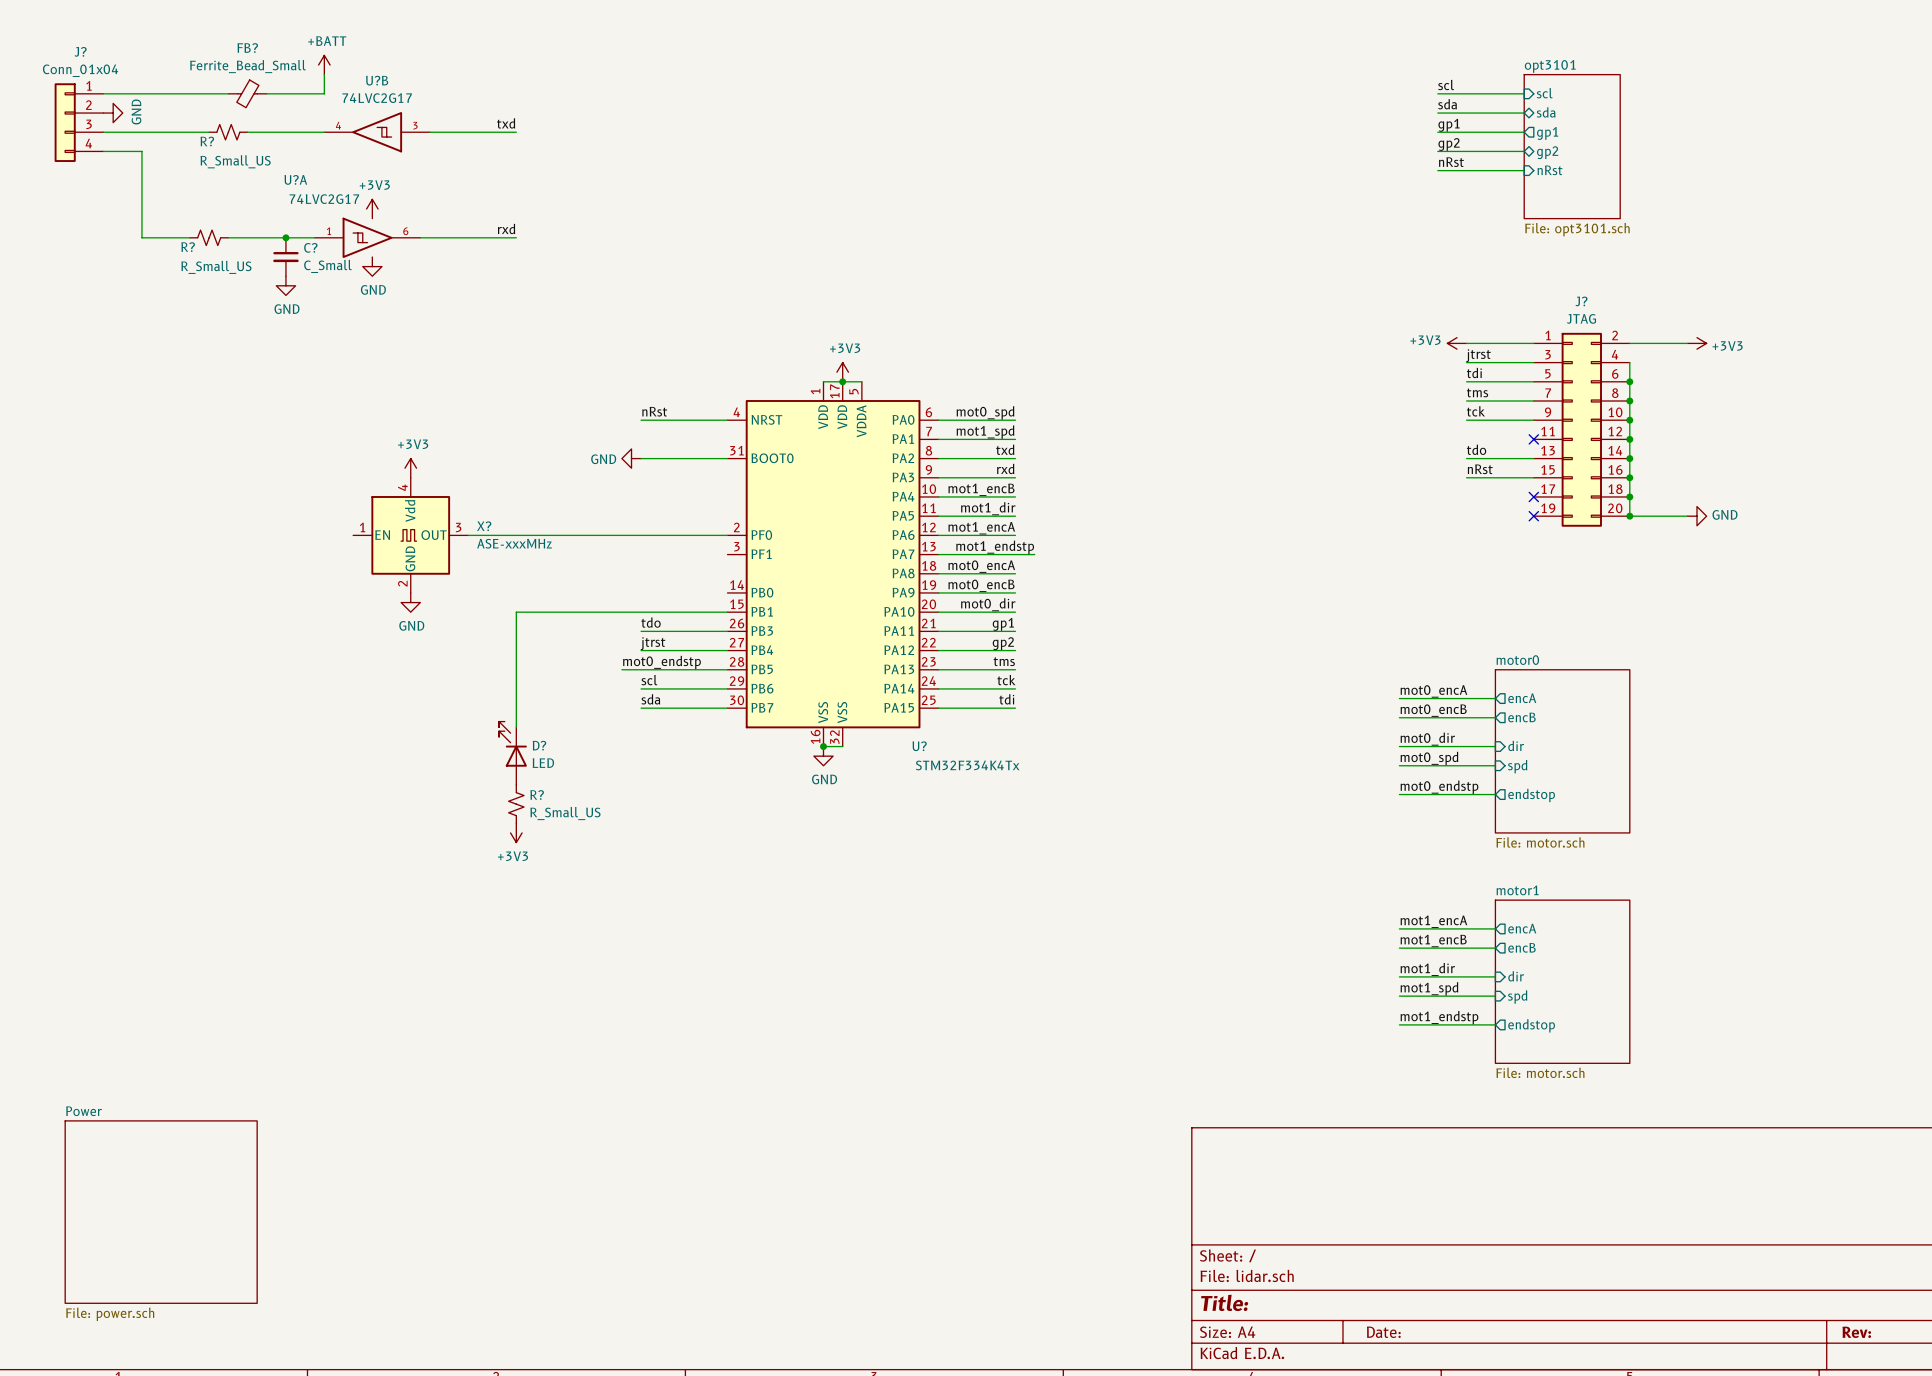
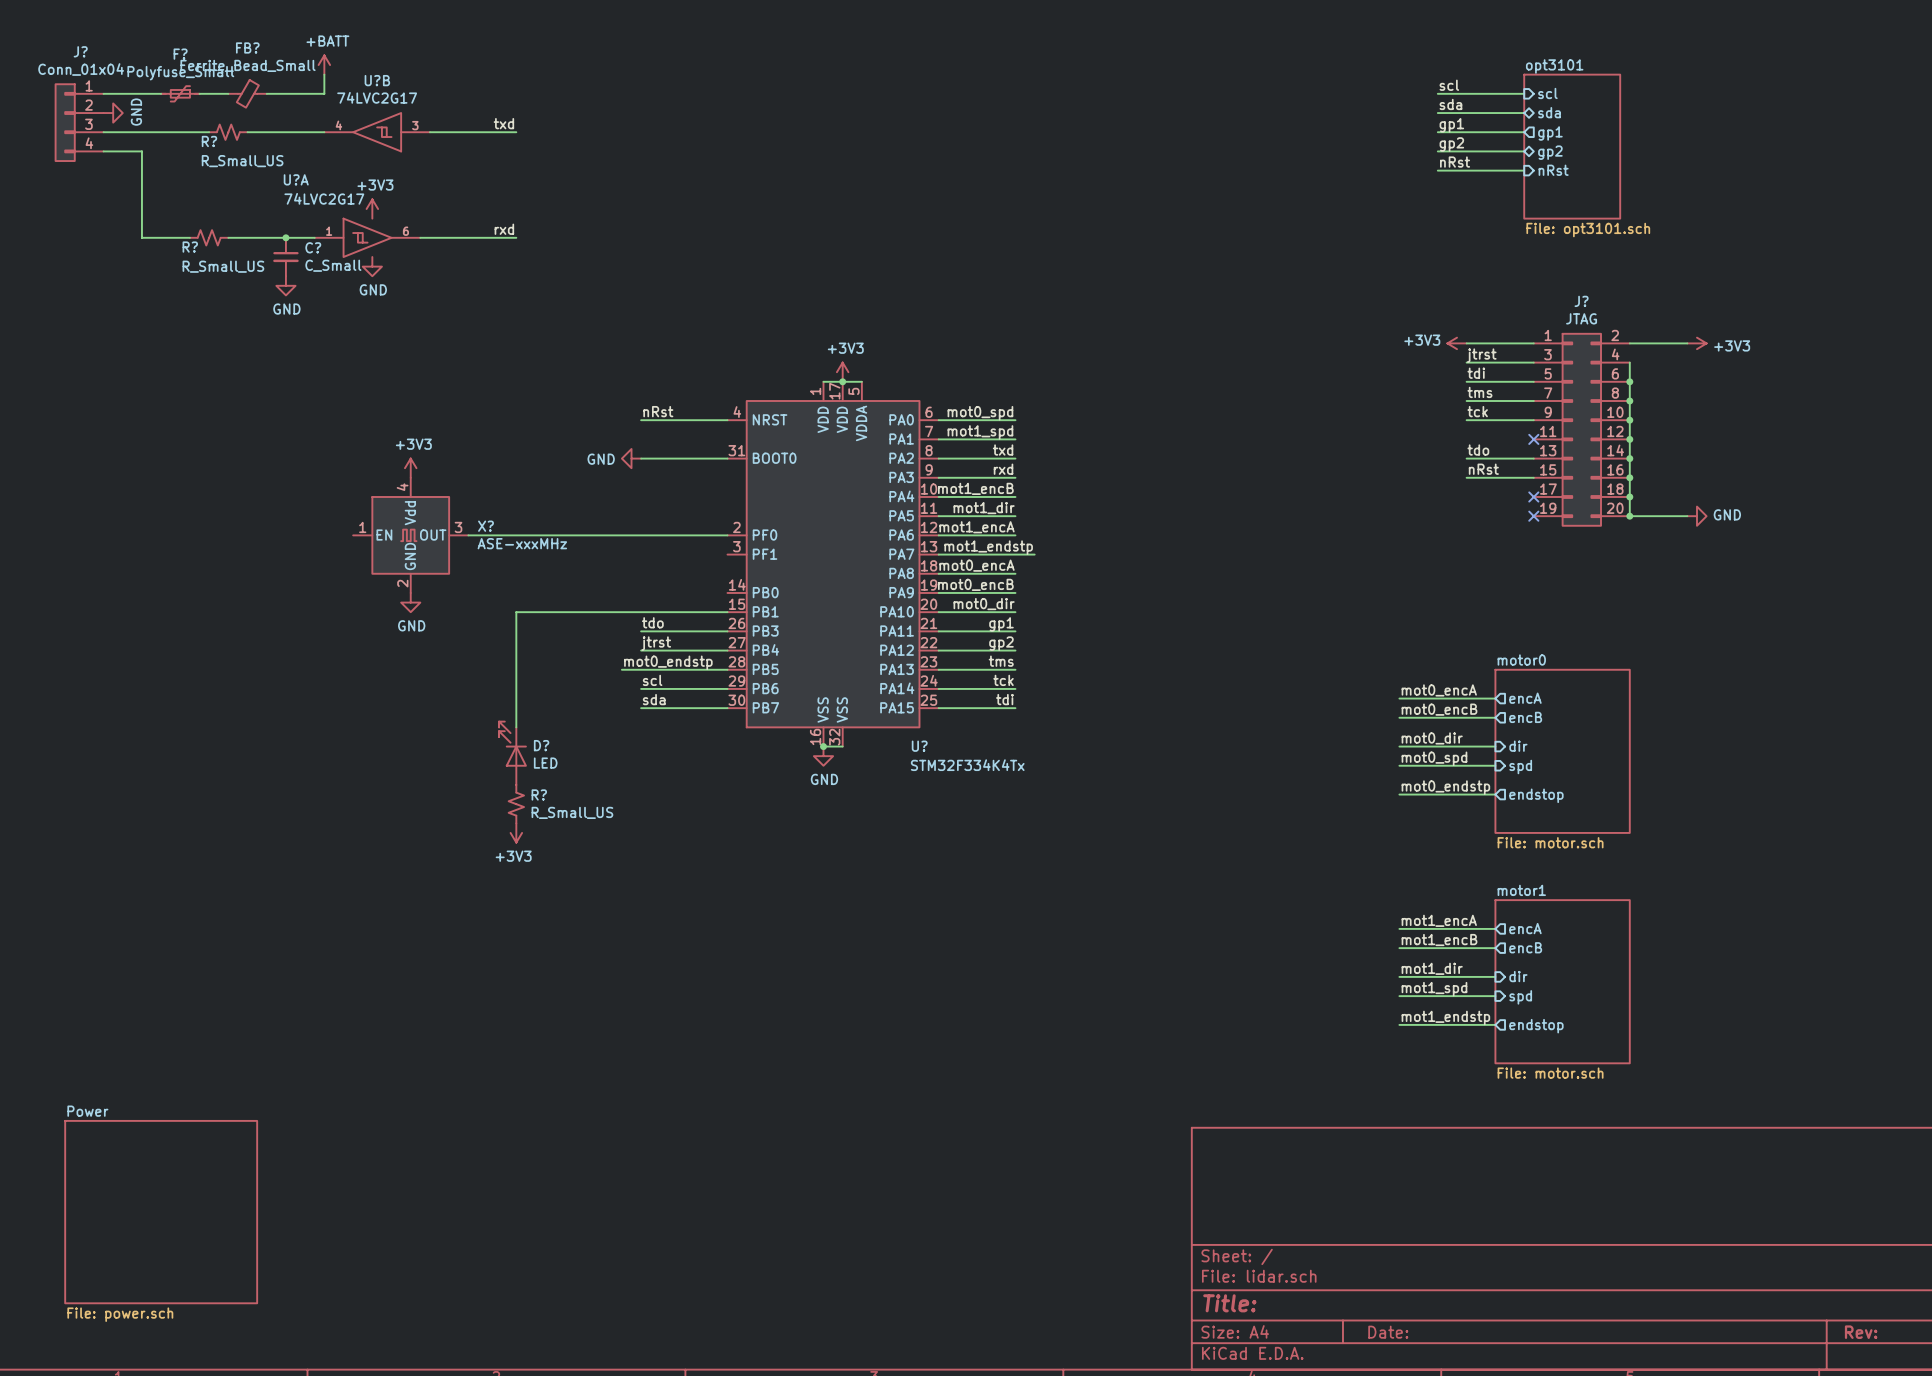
F?: none -> Polyfuse_Small (180, 93)

